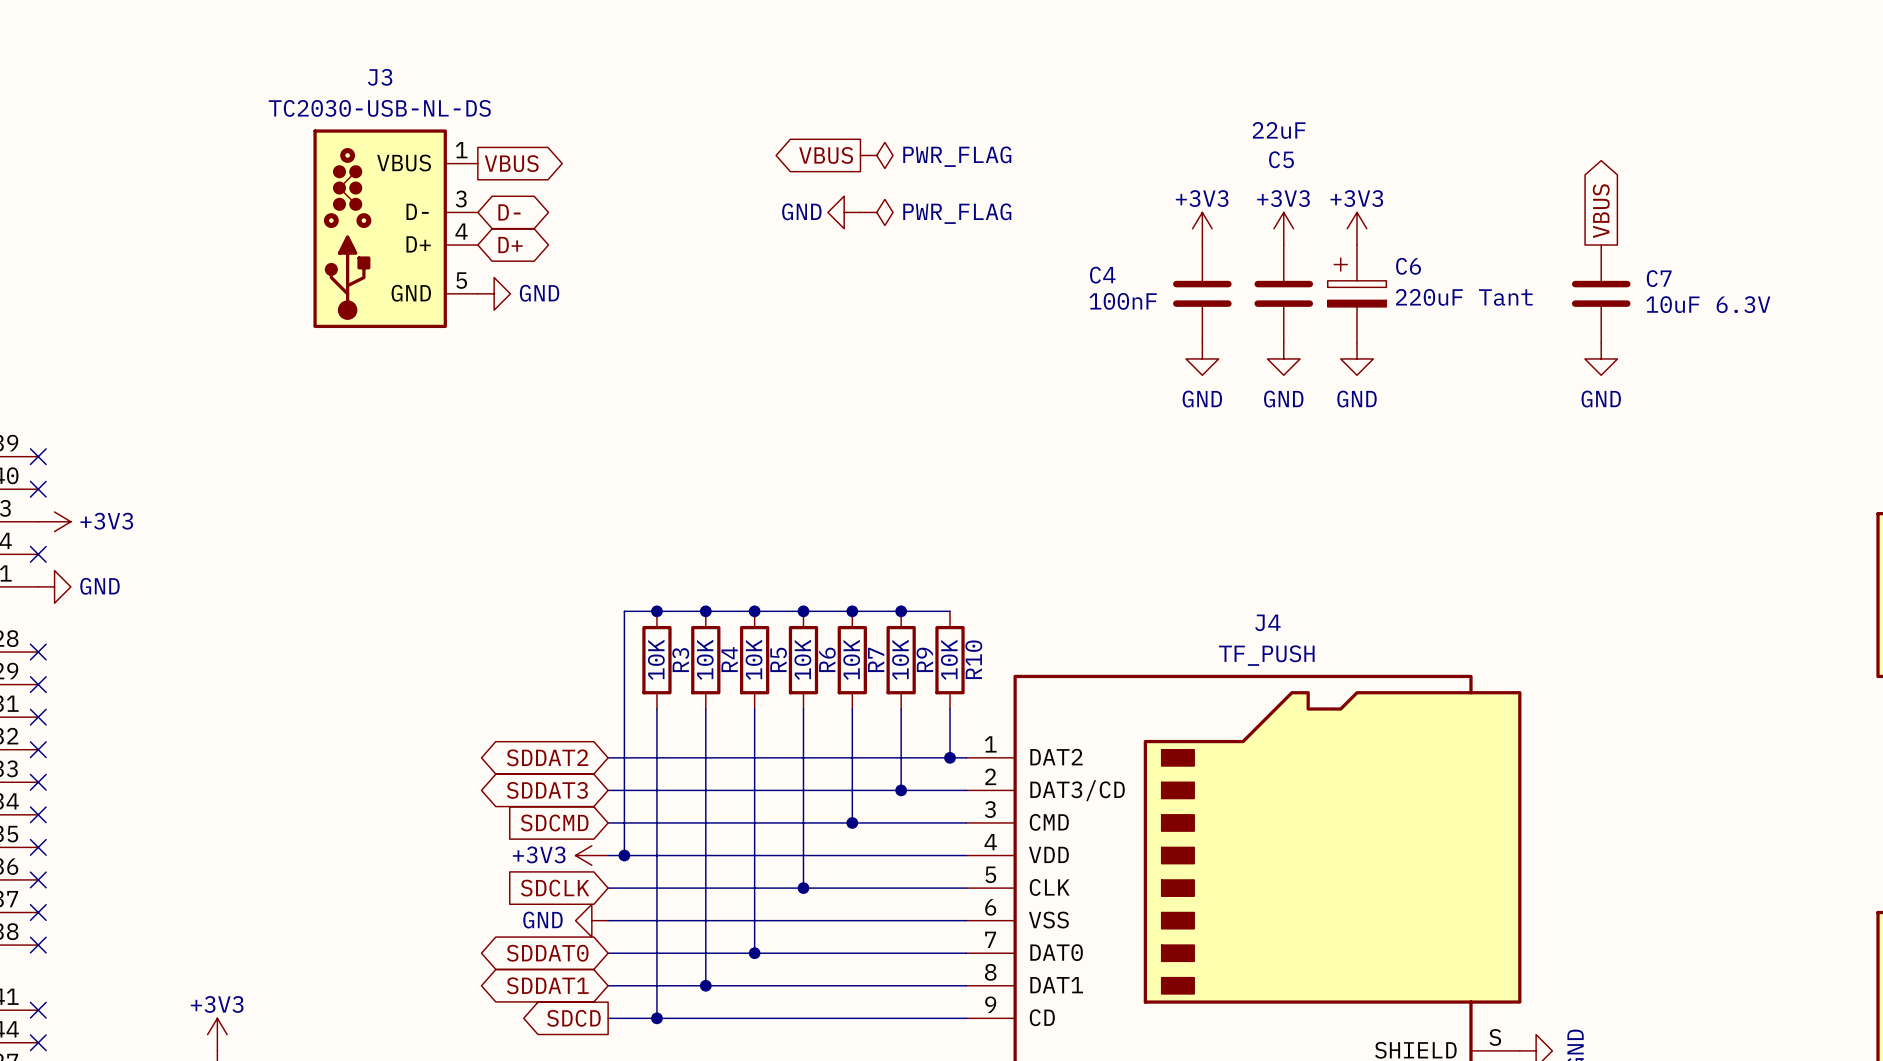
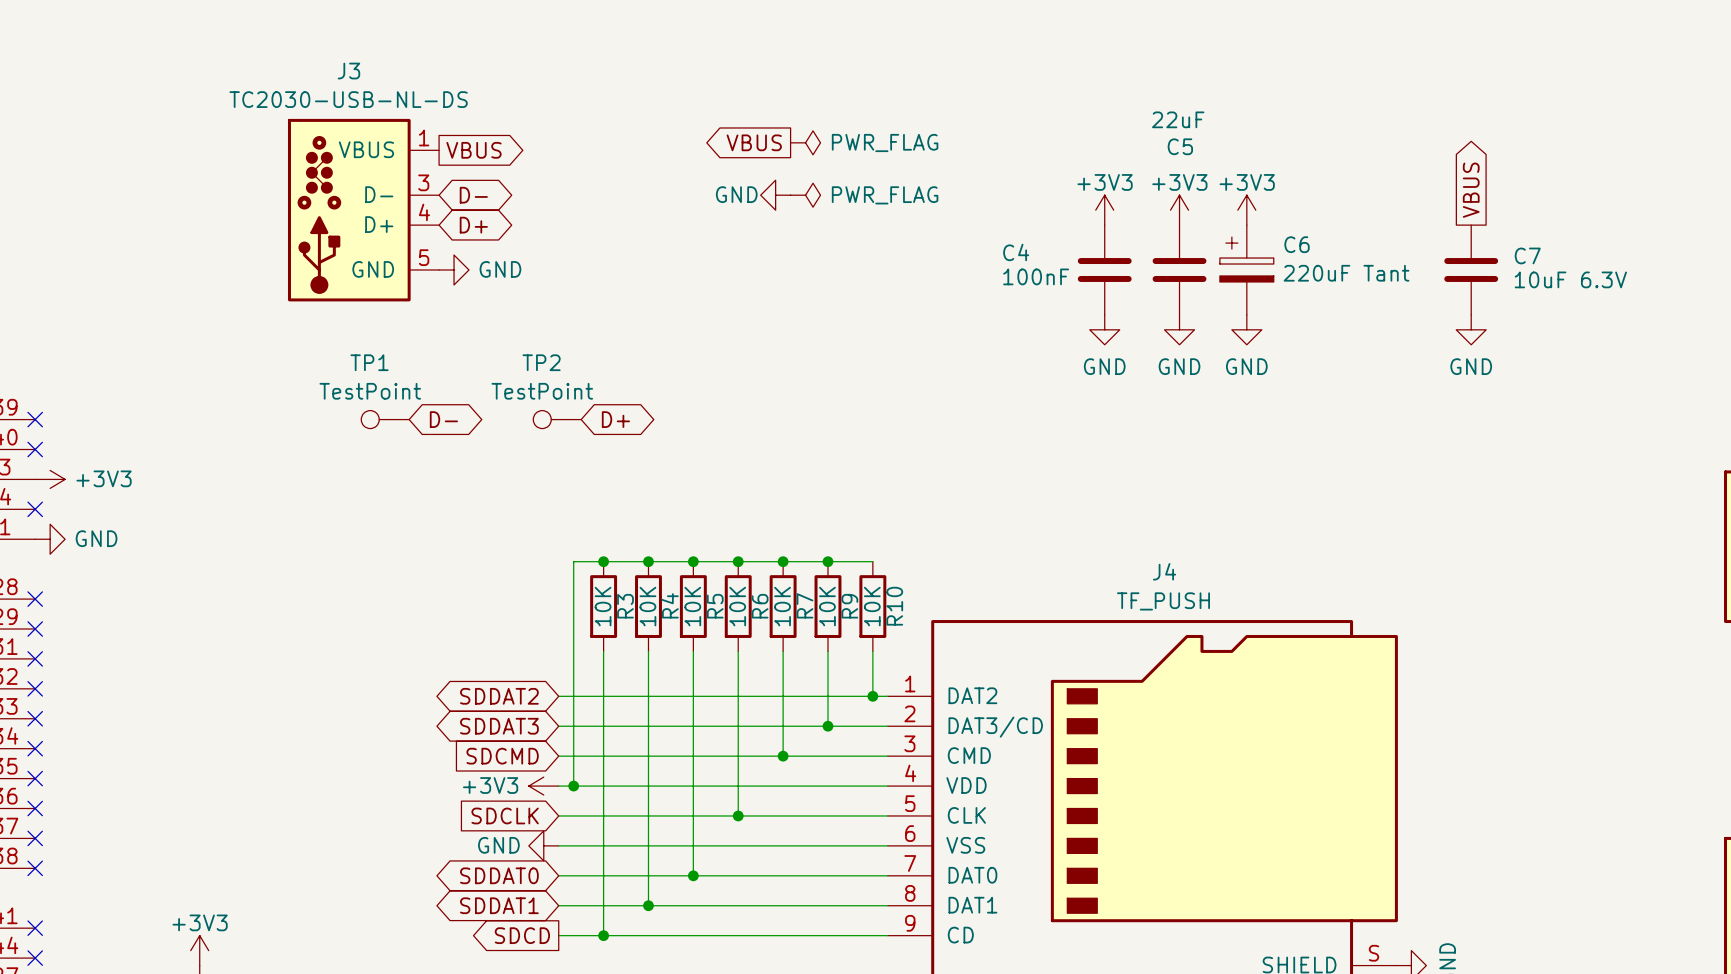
TP1: none -> TestPoint (385, 419)
global label: none -> D- (443, 419)
TP2: none -> TestPoint (557, 419)
global label: none -> D+ (615, 419)

